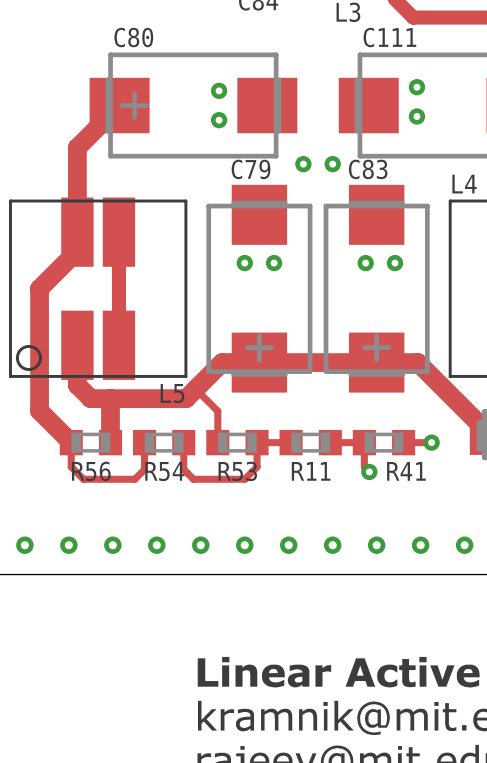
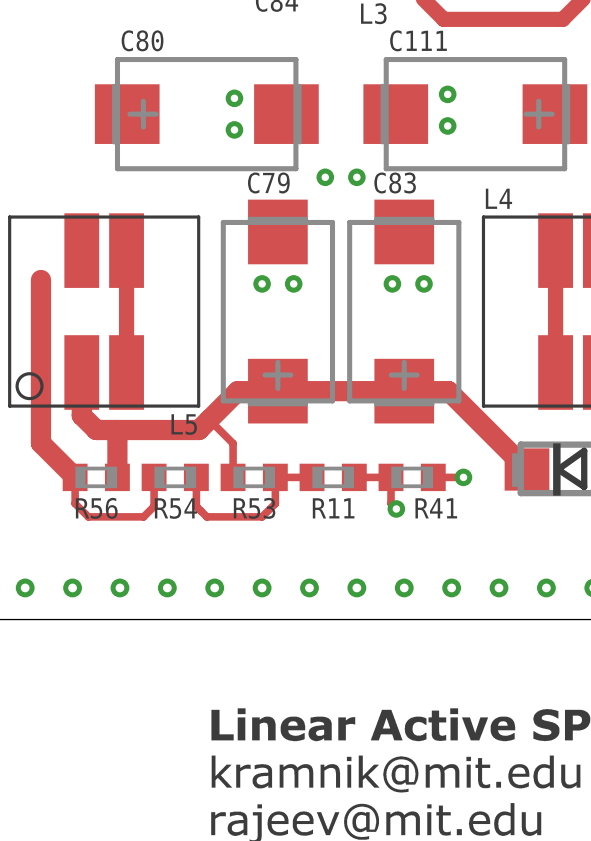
track: (119, 105) (77, 147) (77, 232) -> none
track: (77, 250) (39, 288) -> (40, 279) (40, 311)

